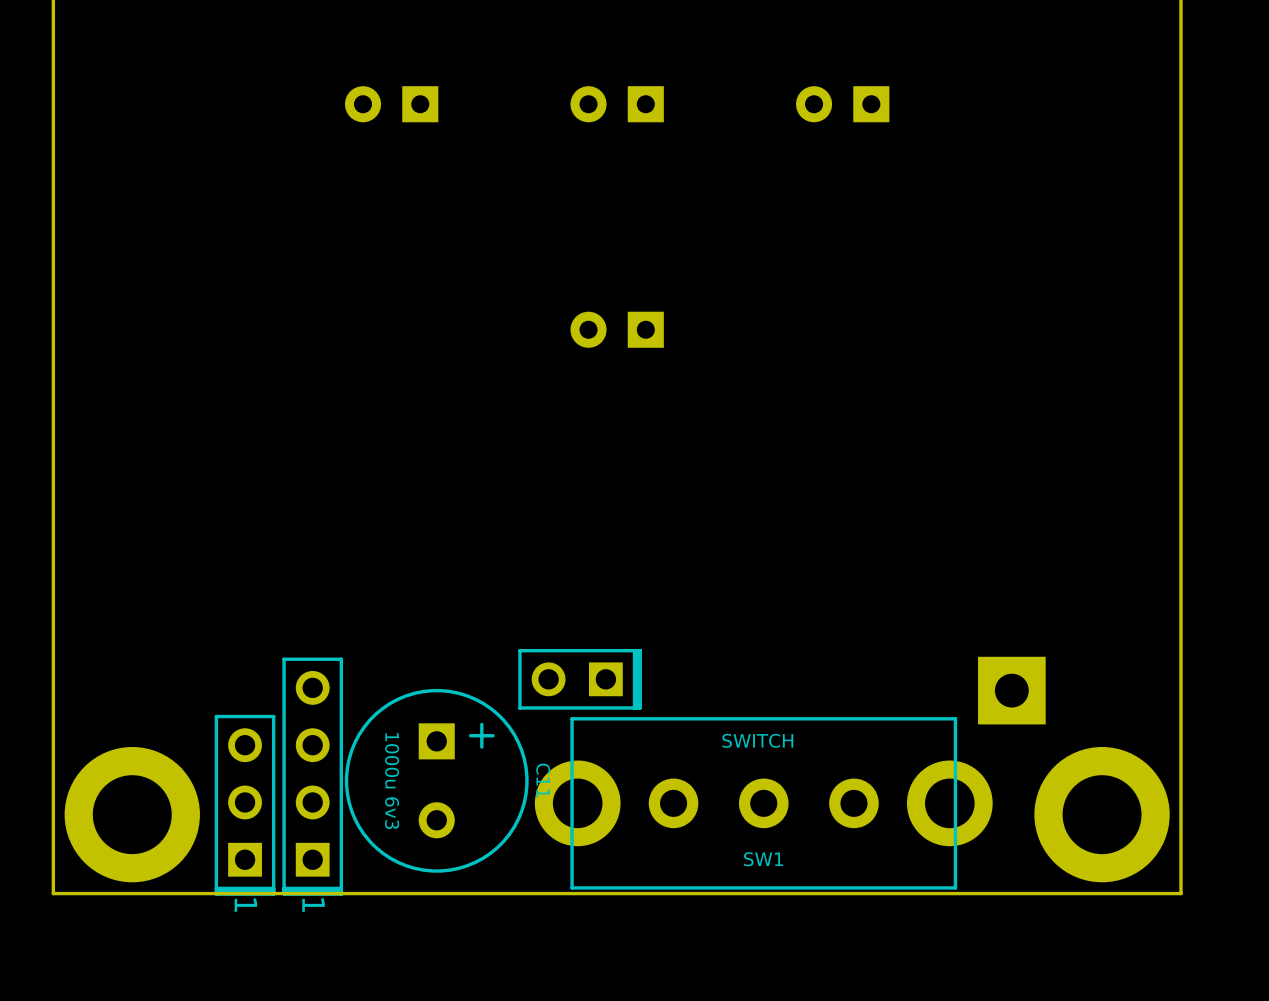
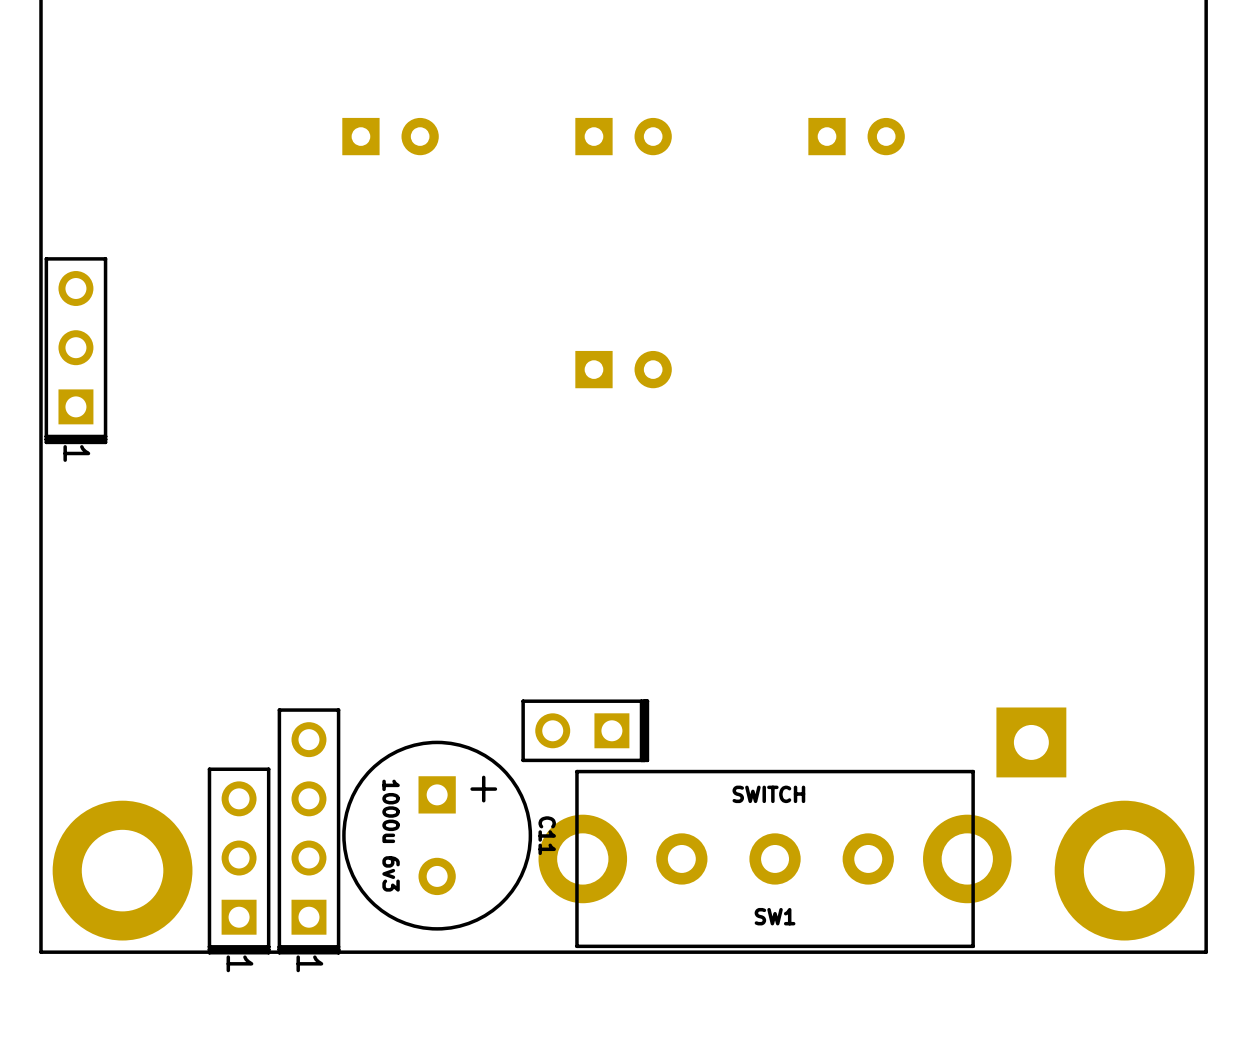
part rotation: 0° (391, 104) -> 180° (390, 136)
part rotation: 0° (617, 104) -> 180° (623, 136)
part rotation: 0° (842, 104) -> 180° (856, 136)
part: none -> (75, 350)
part rotation: 0° (617, 329) -> 180° (623, 369)

